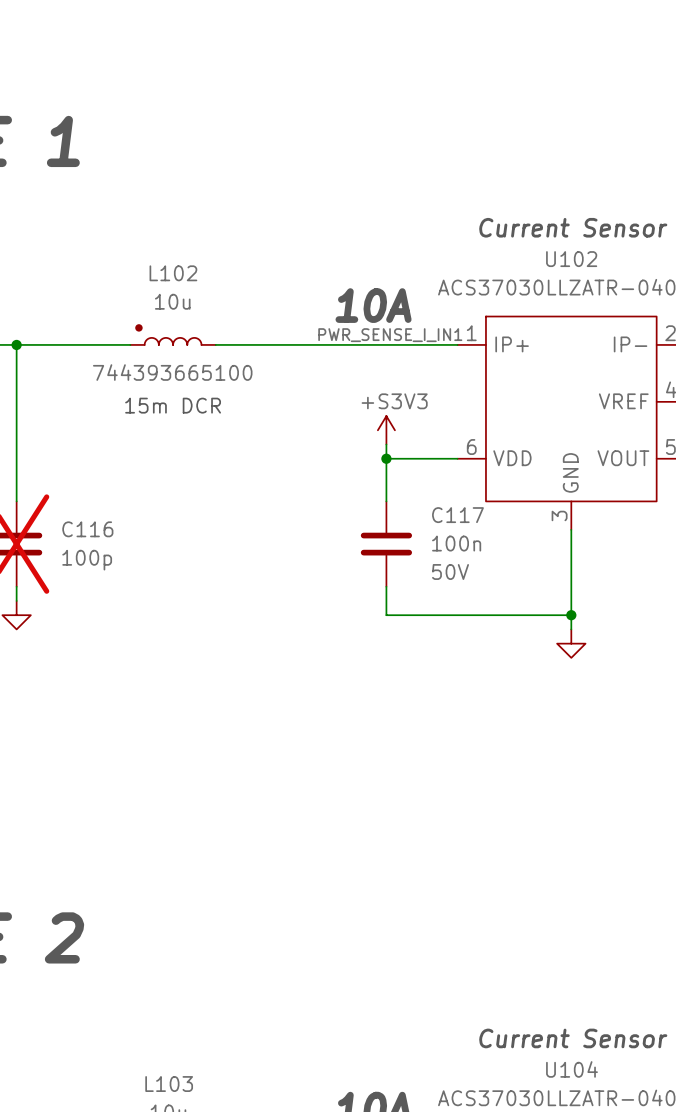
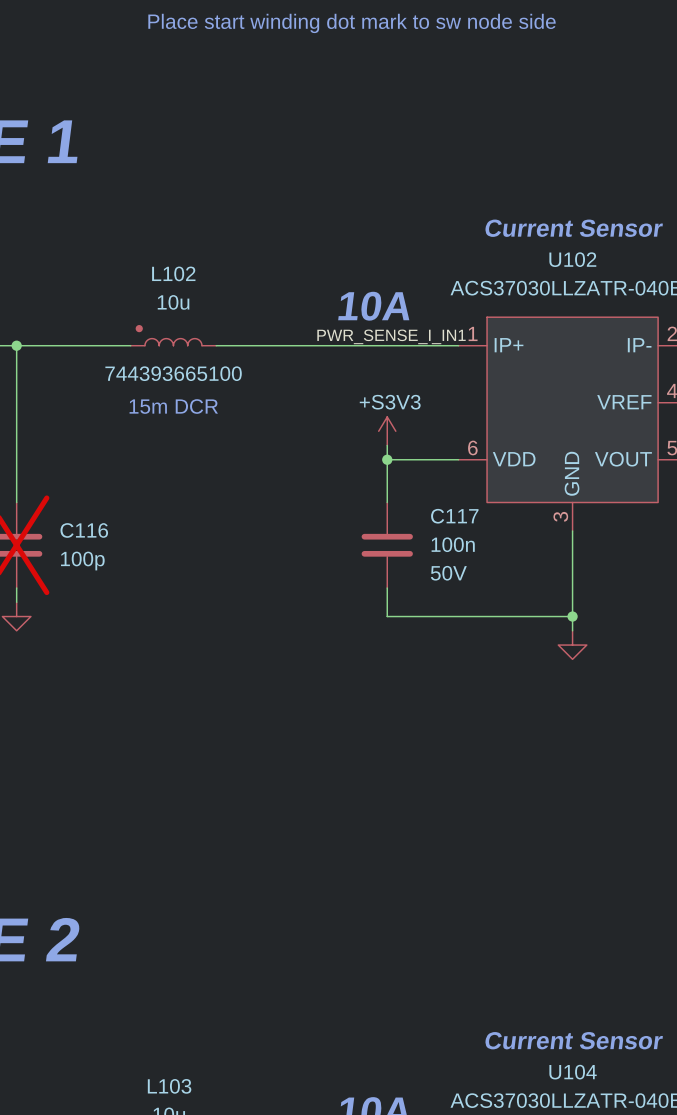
text: none -> Place start winding dot mark to sw node side (352, 23)

